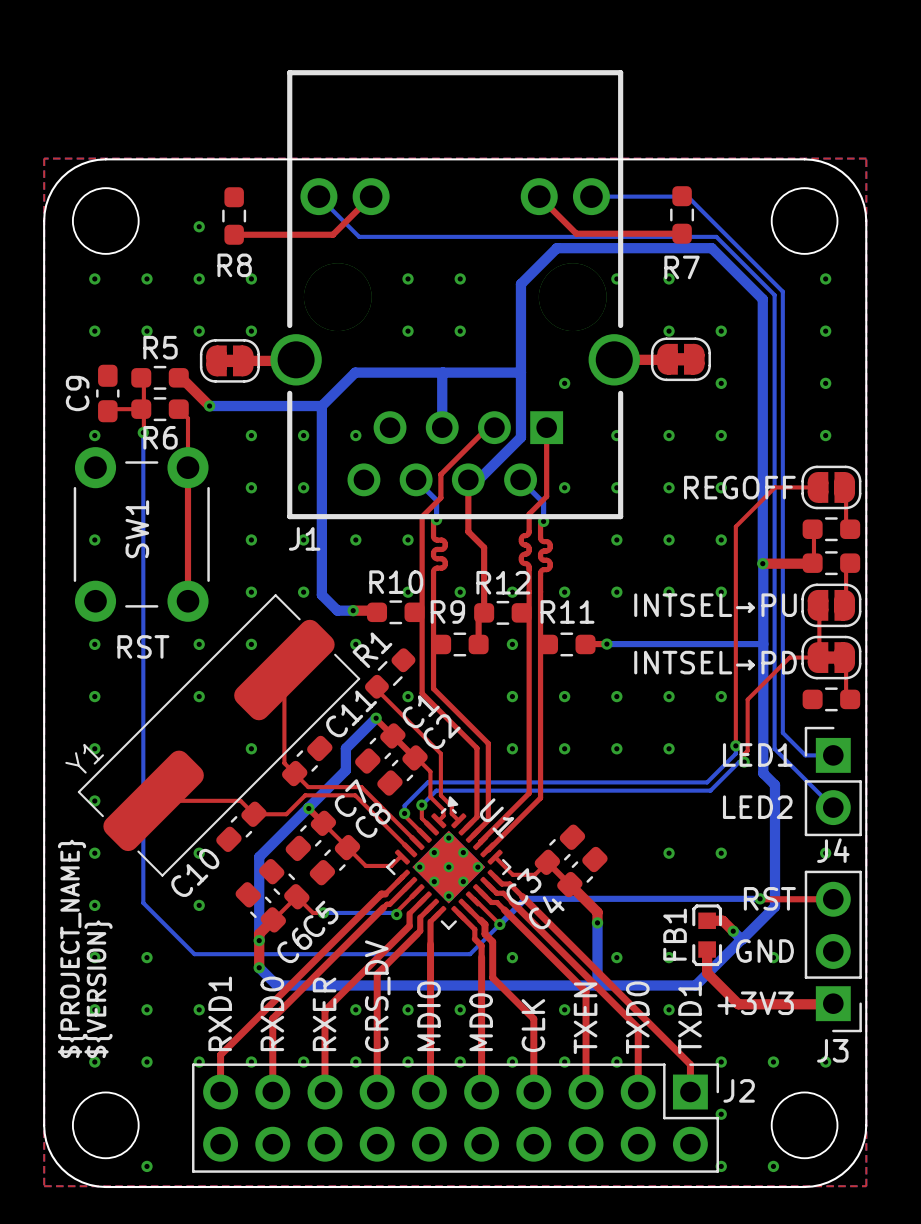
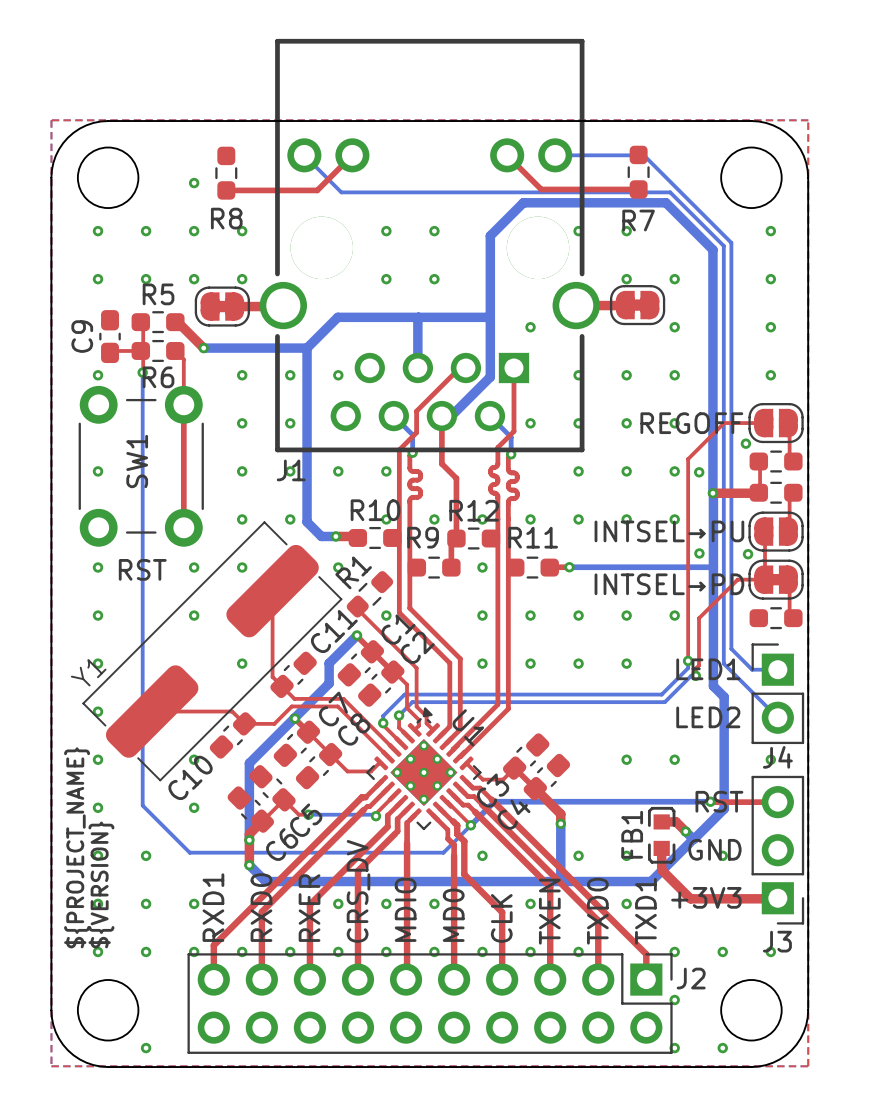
via: none -> (745, 443)
via: none -> (699, 472)
via: none -> (699, 553)
via: none -> (748, 554)

